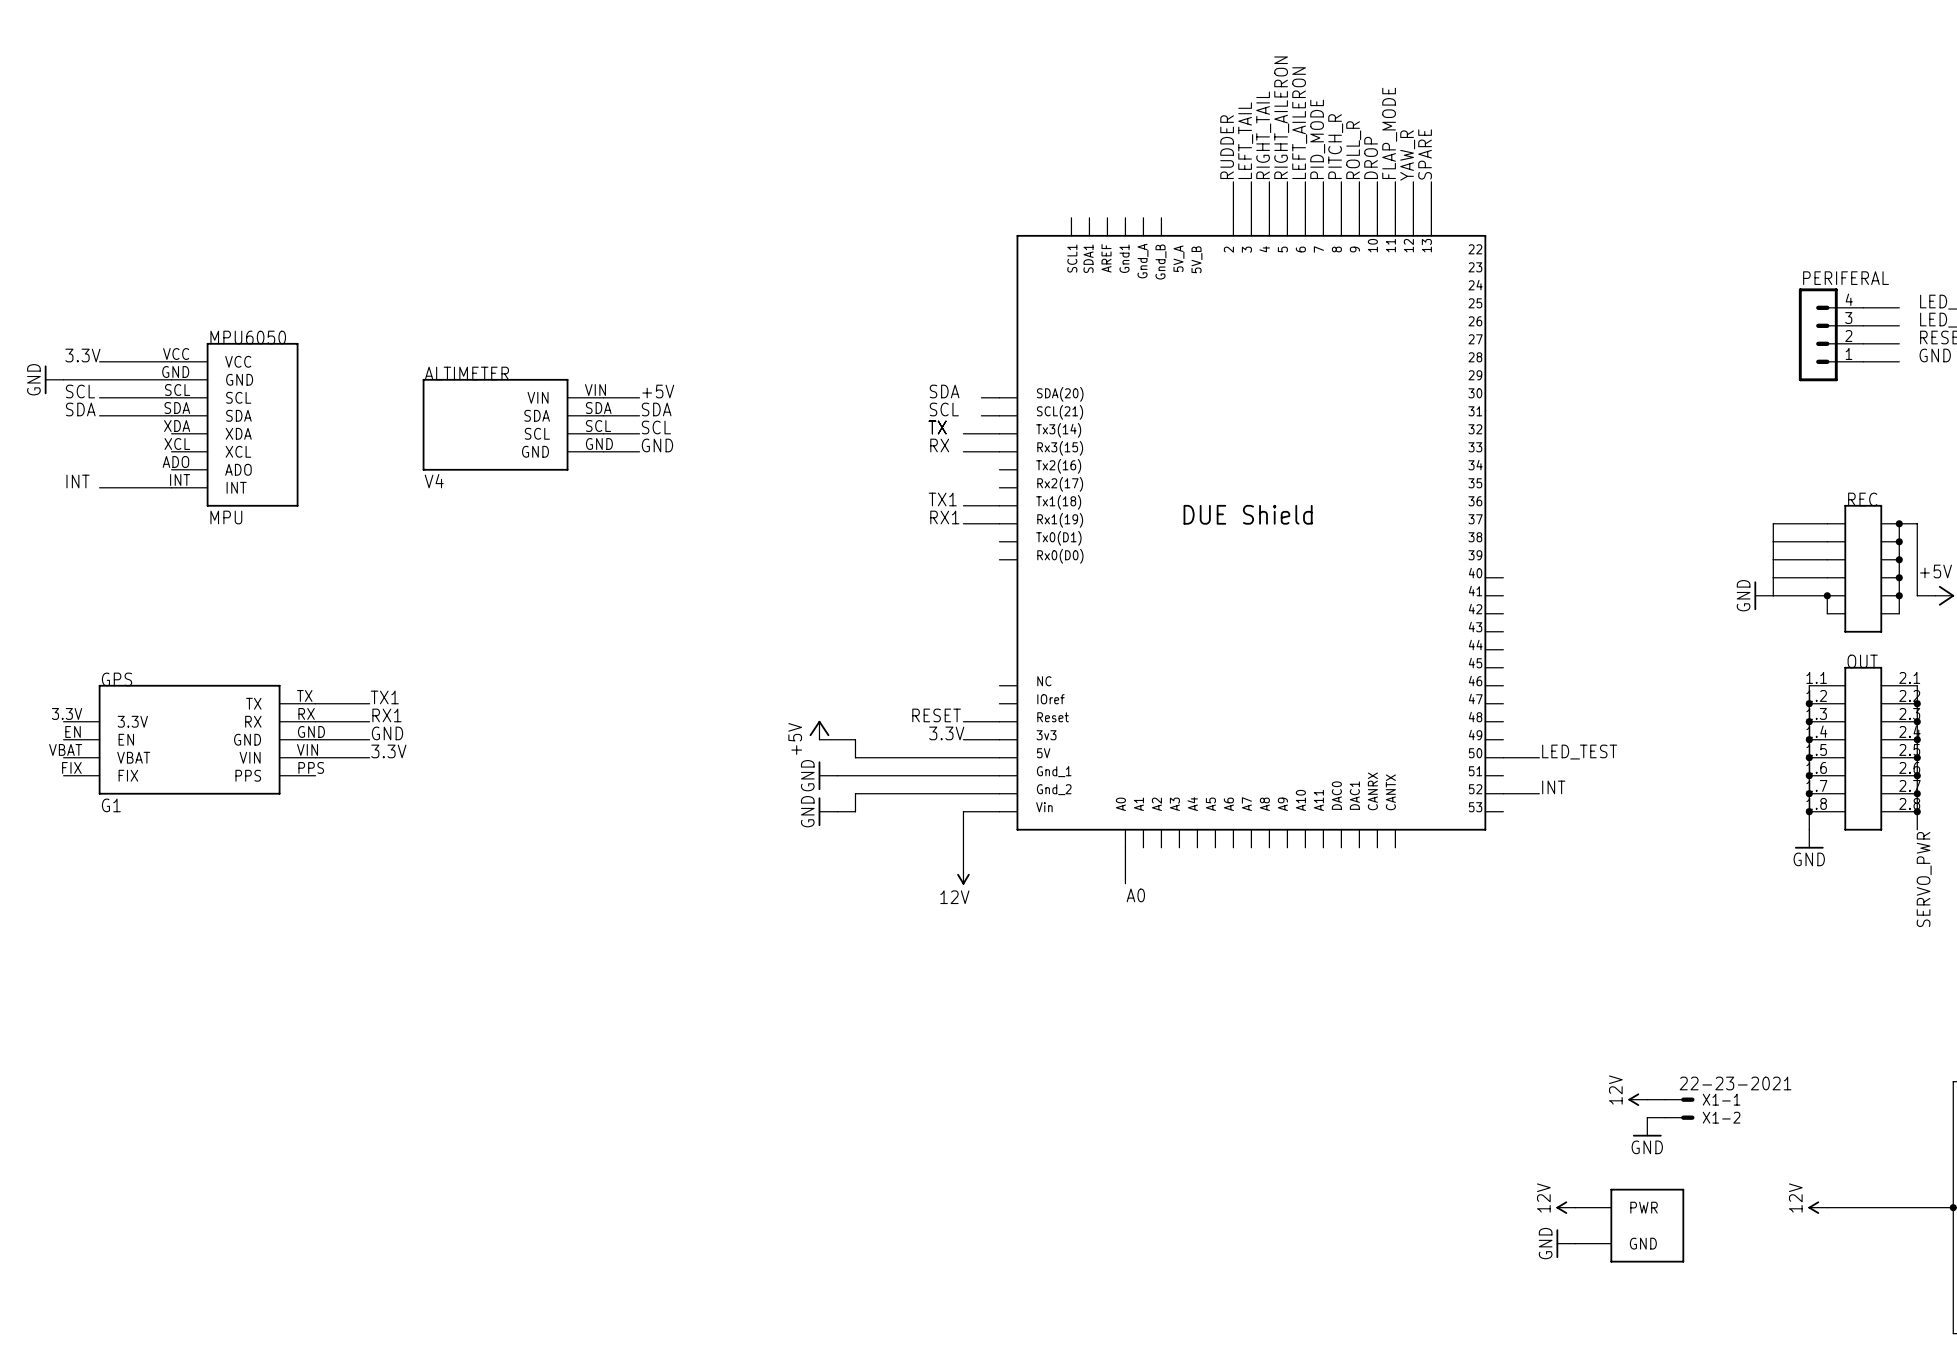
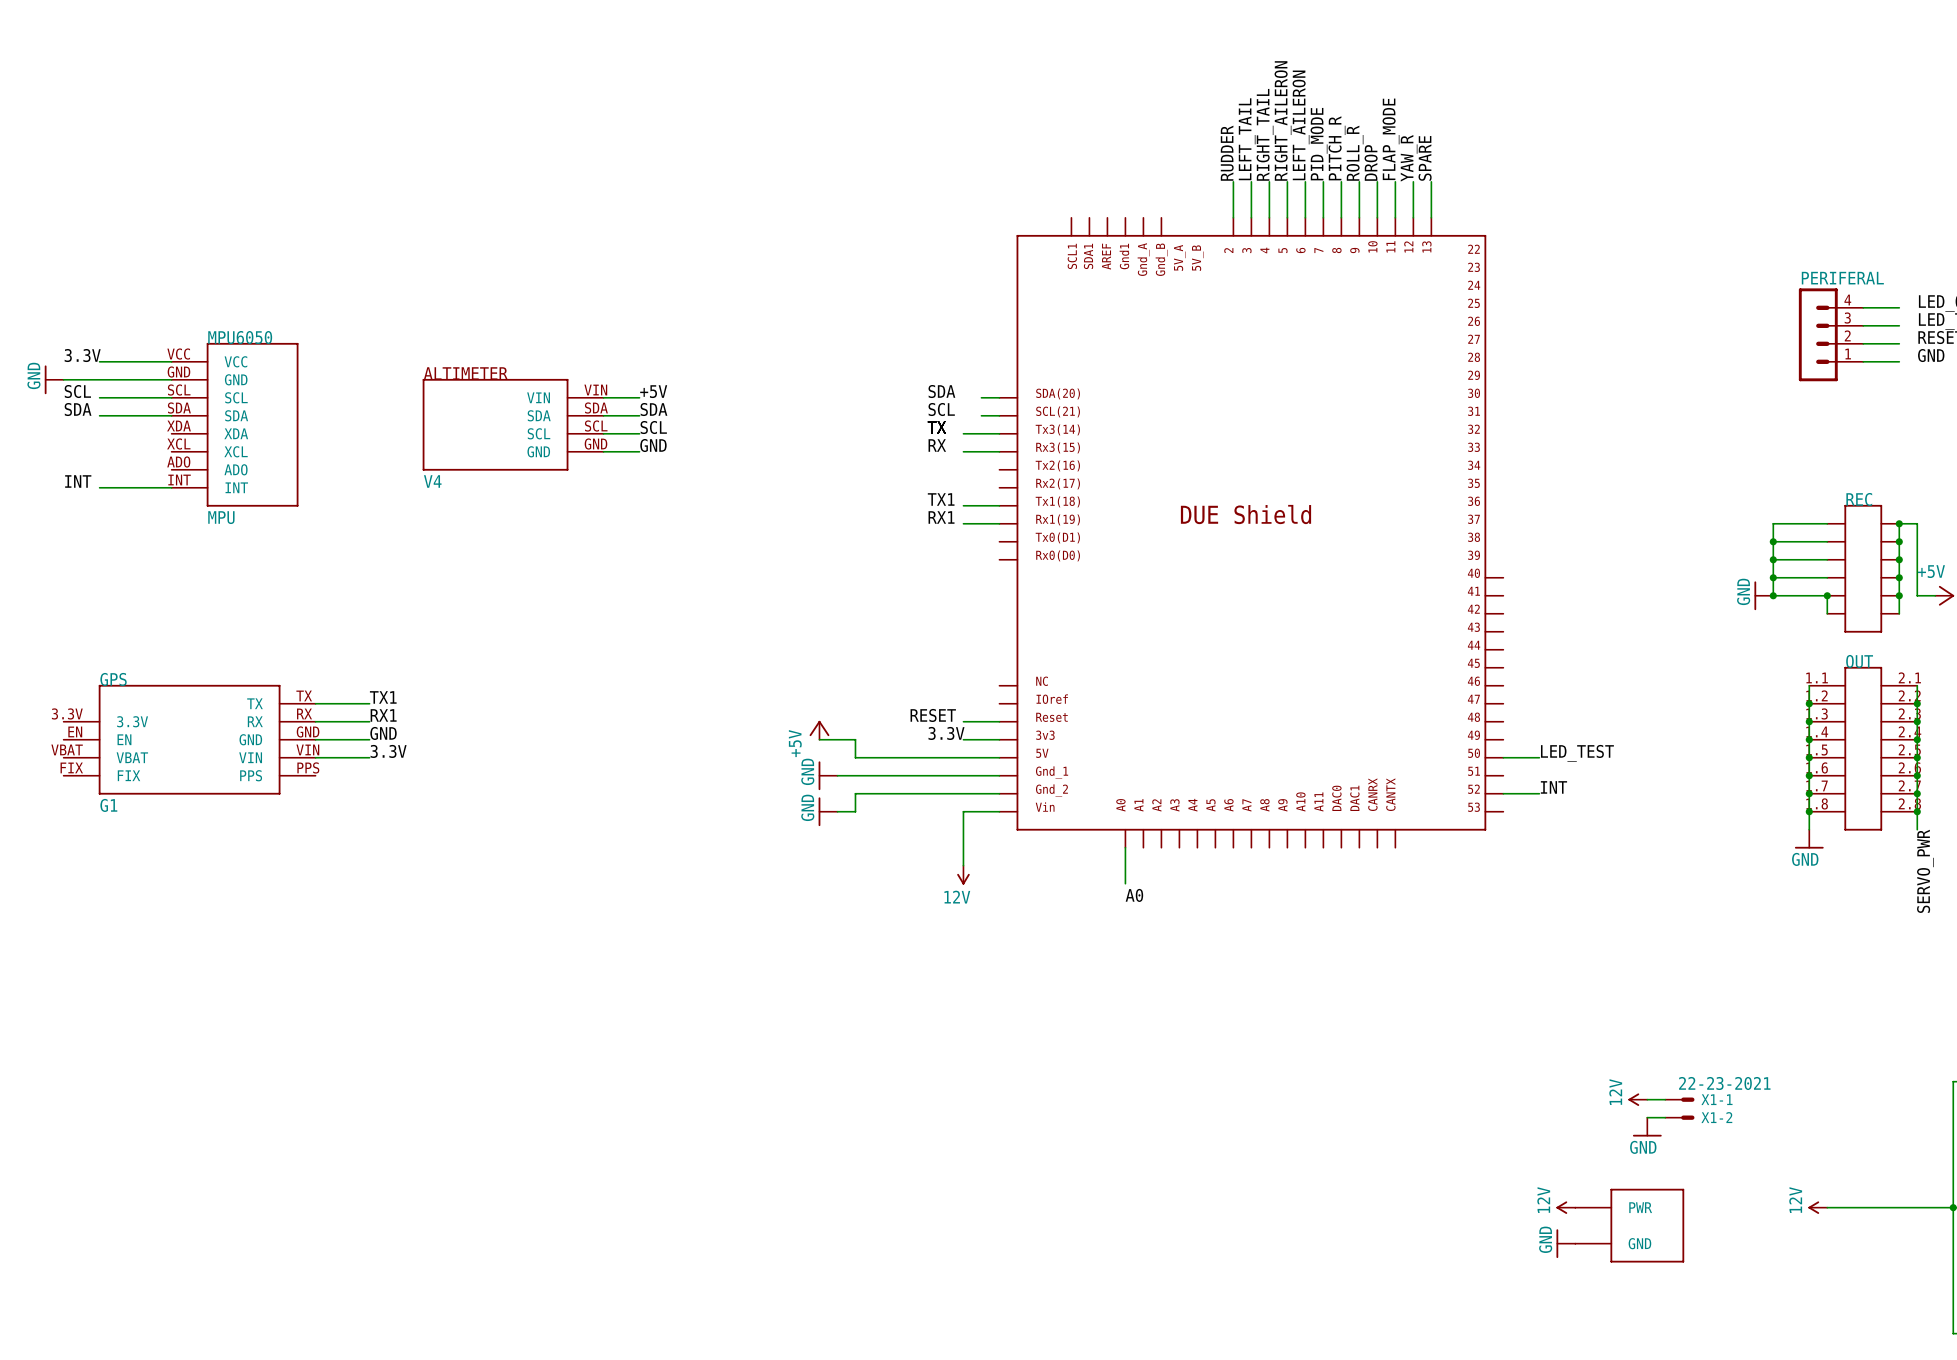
junction: none -> (1773, 541)
junction: none -> (1773, 559)
junction: none -> (1773, 577)
junction: none -> (1773, 595)

